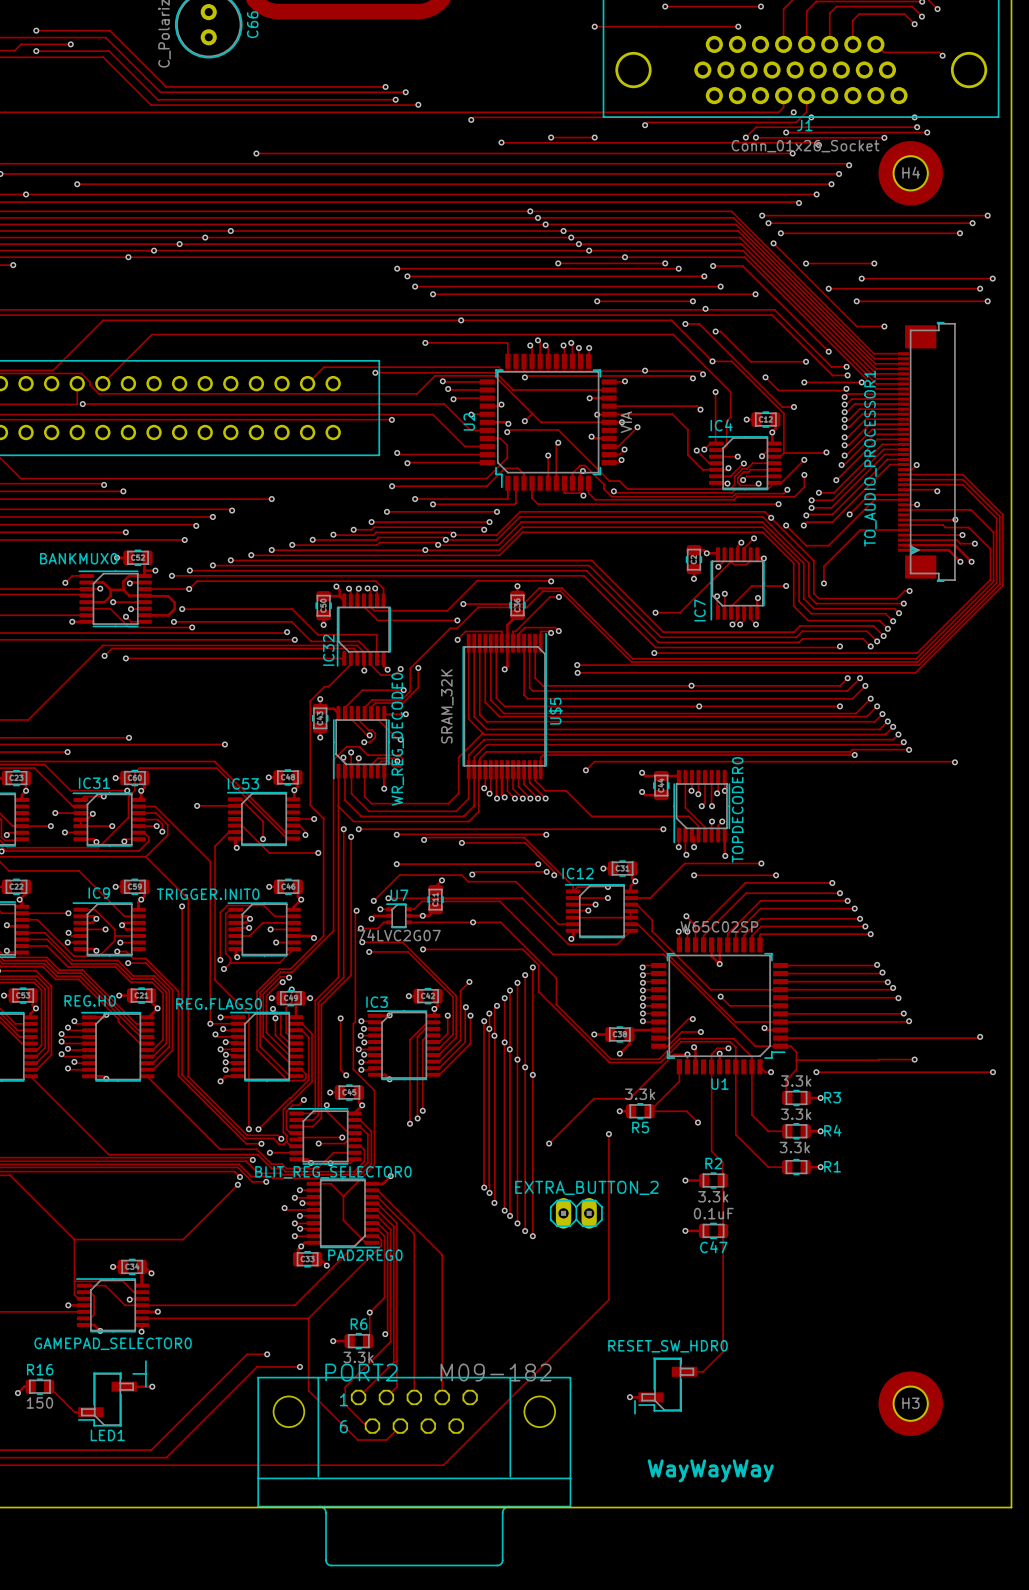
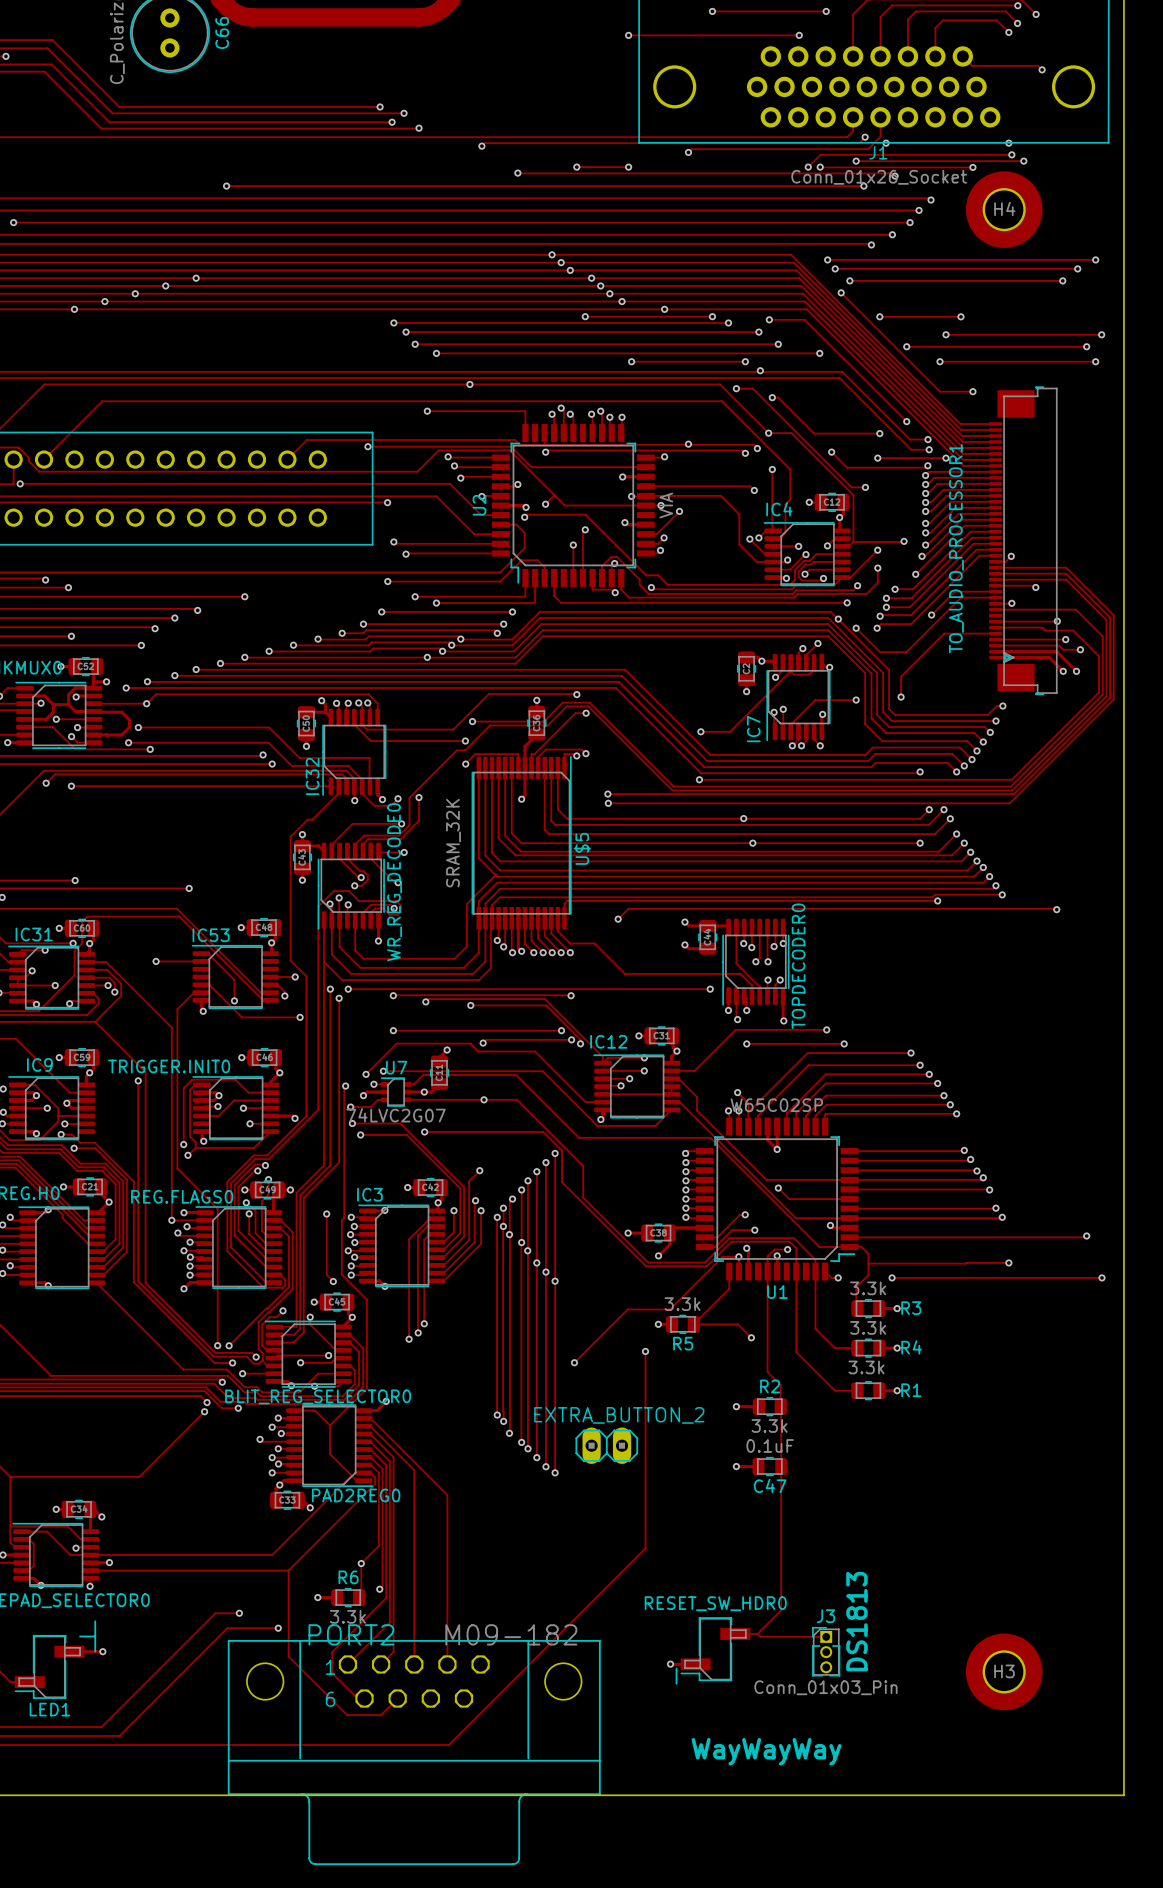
text: none -> DS1813 (856, 1621)
track: none -> (757, 1633) (760, 1636) (826, 1636)
J3: none -> Conn_01x03_Pin (826, 1651)

